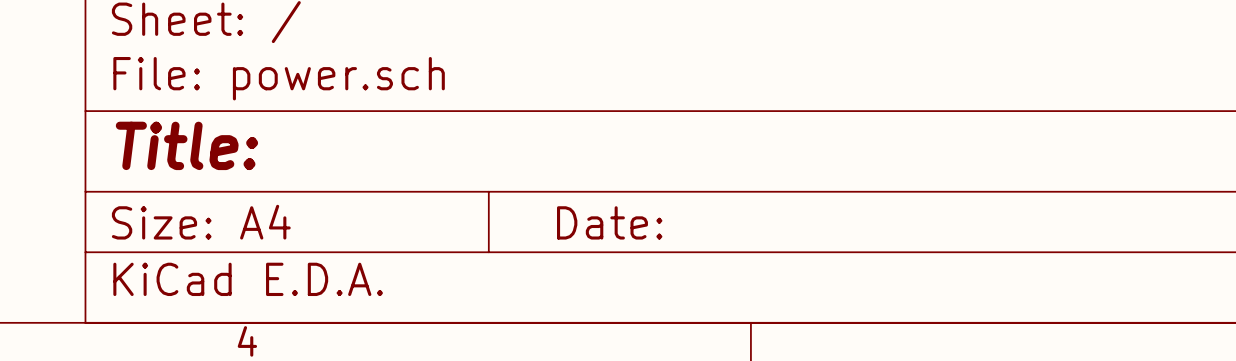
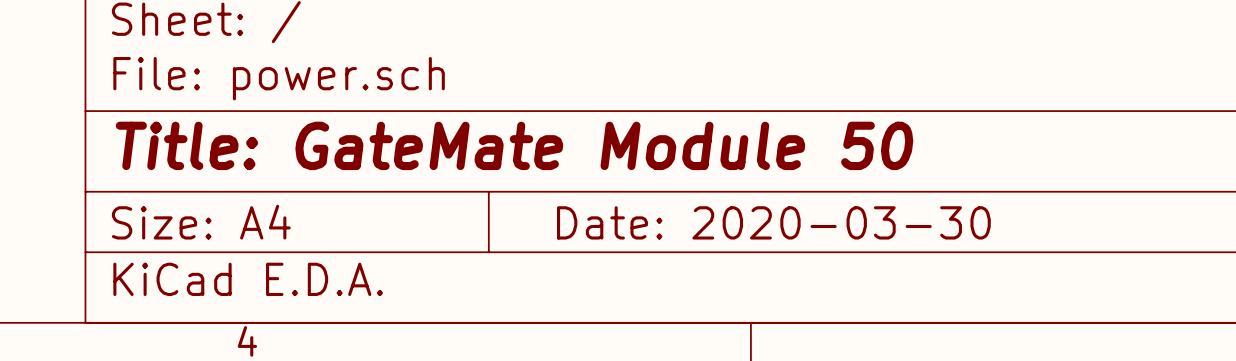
title block: Title: (186, 145) -> Title: GateMate Module 50 (514, 145)
title block: Date: (609, 222) -> Date: 2020-03-30 (773, 222)

